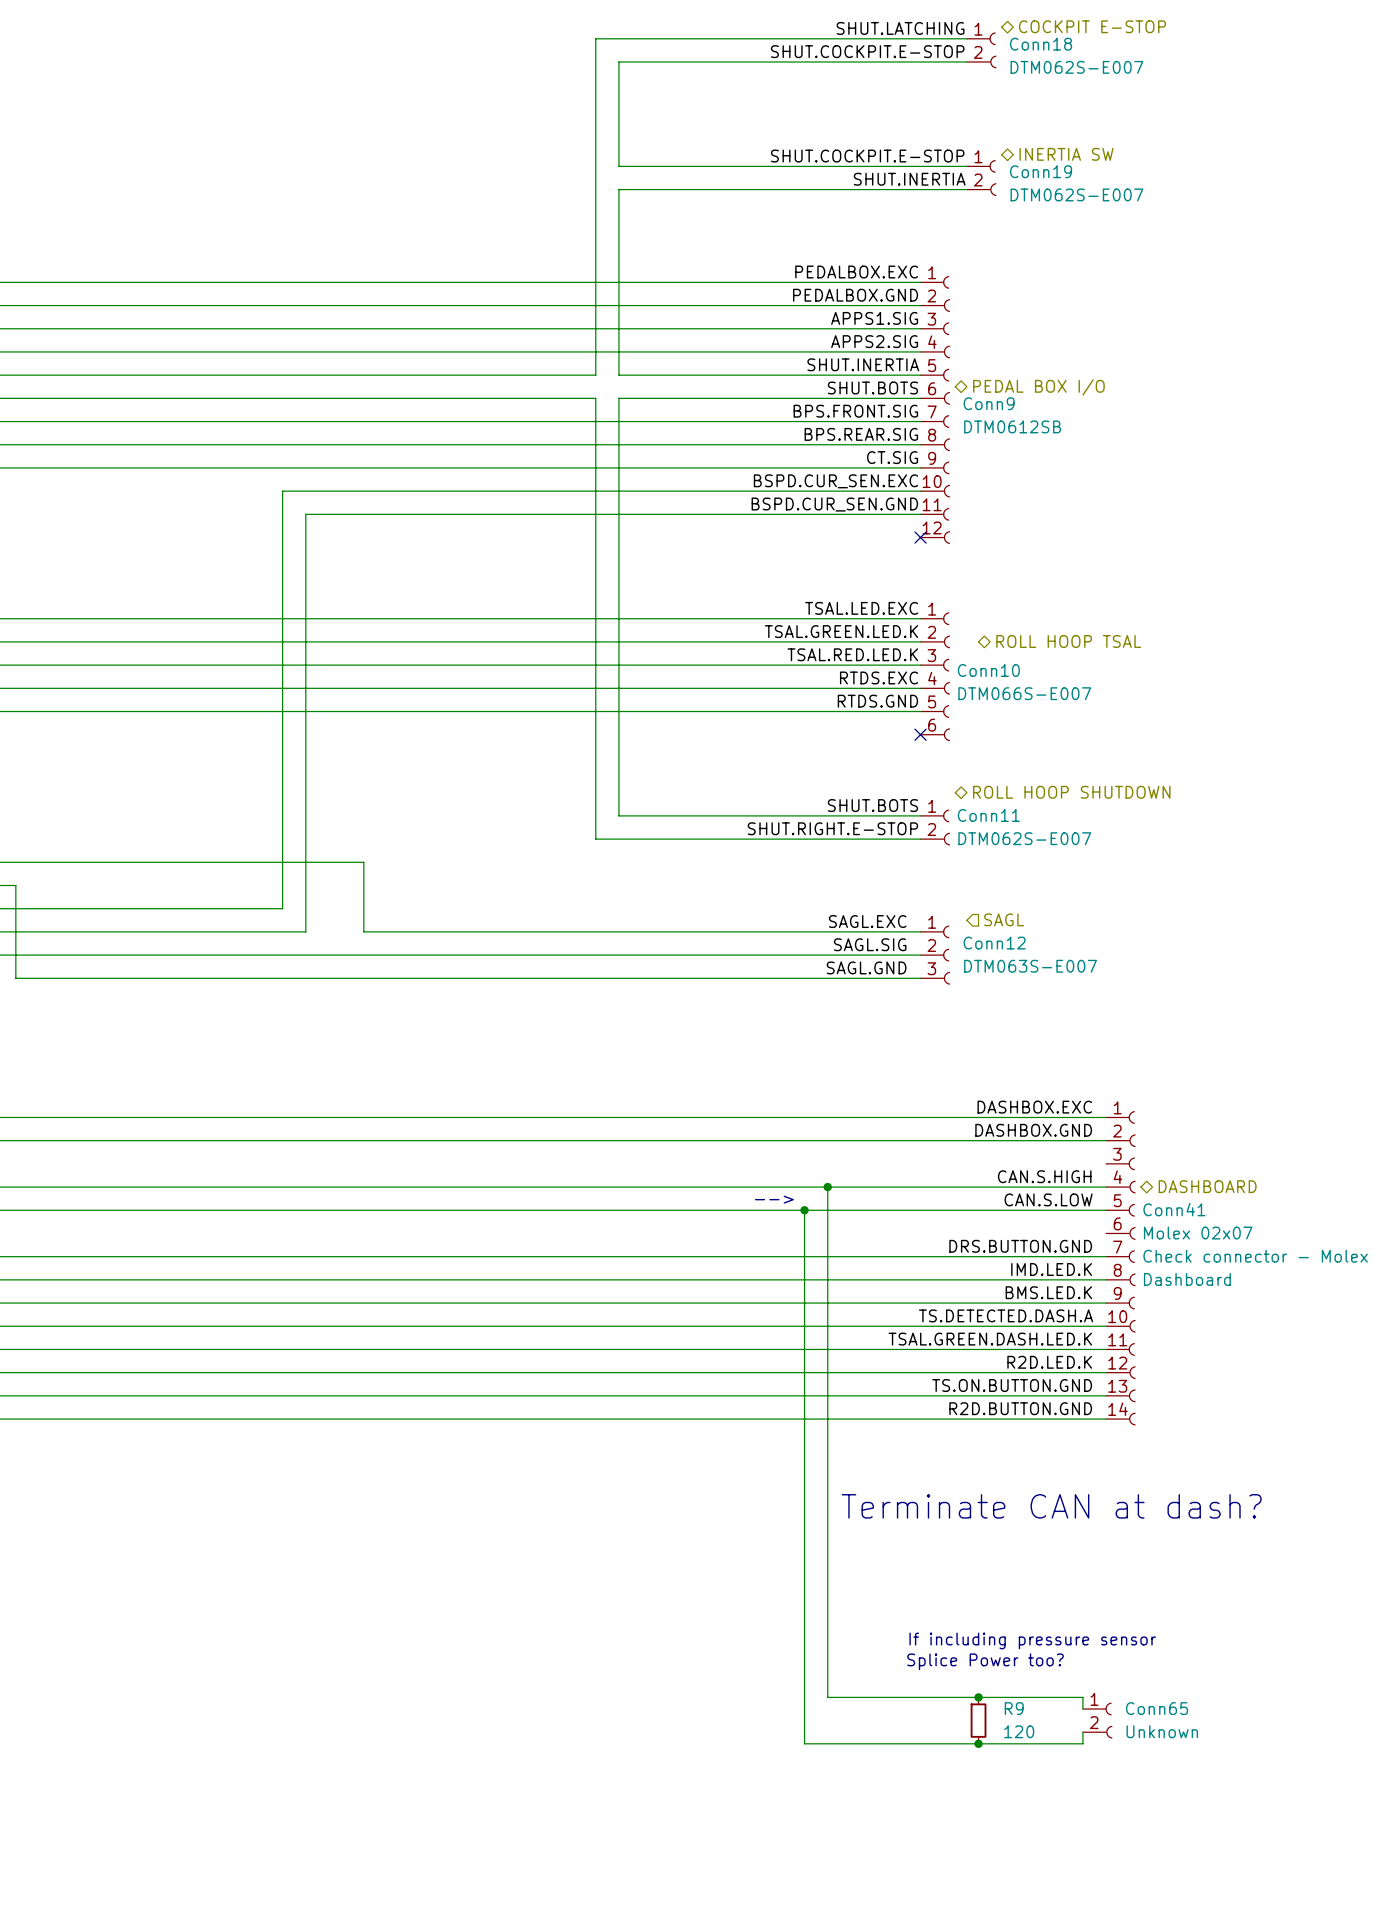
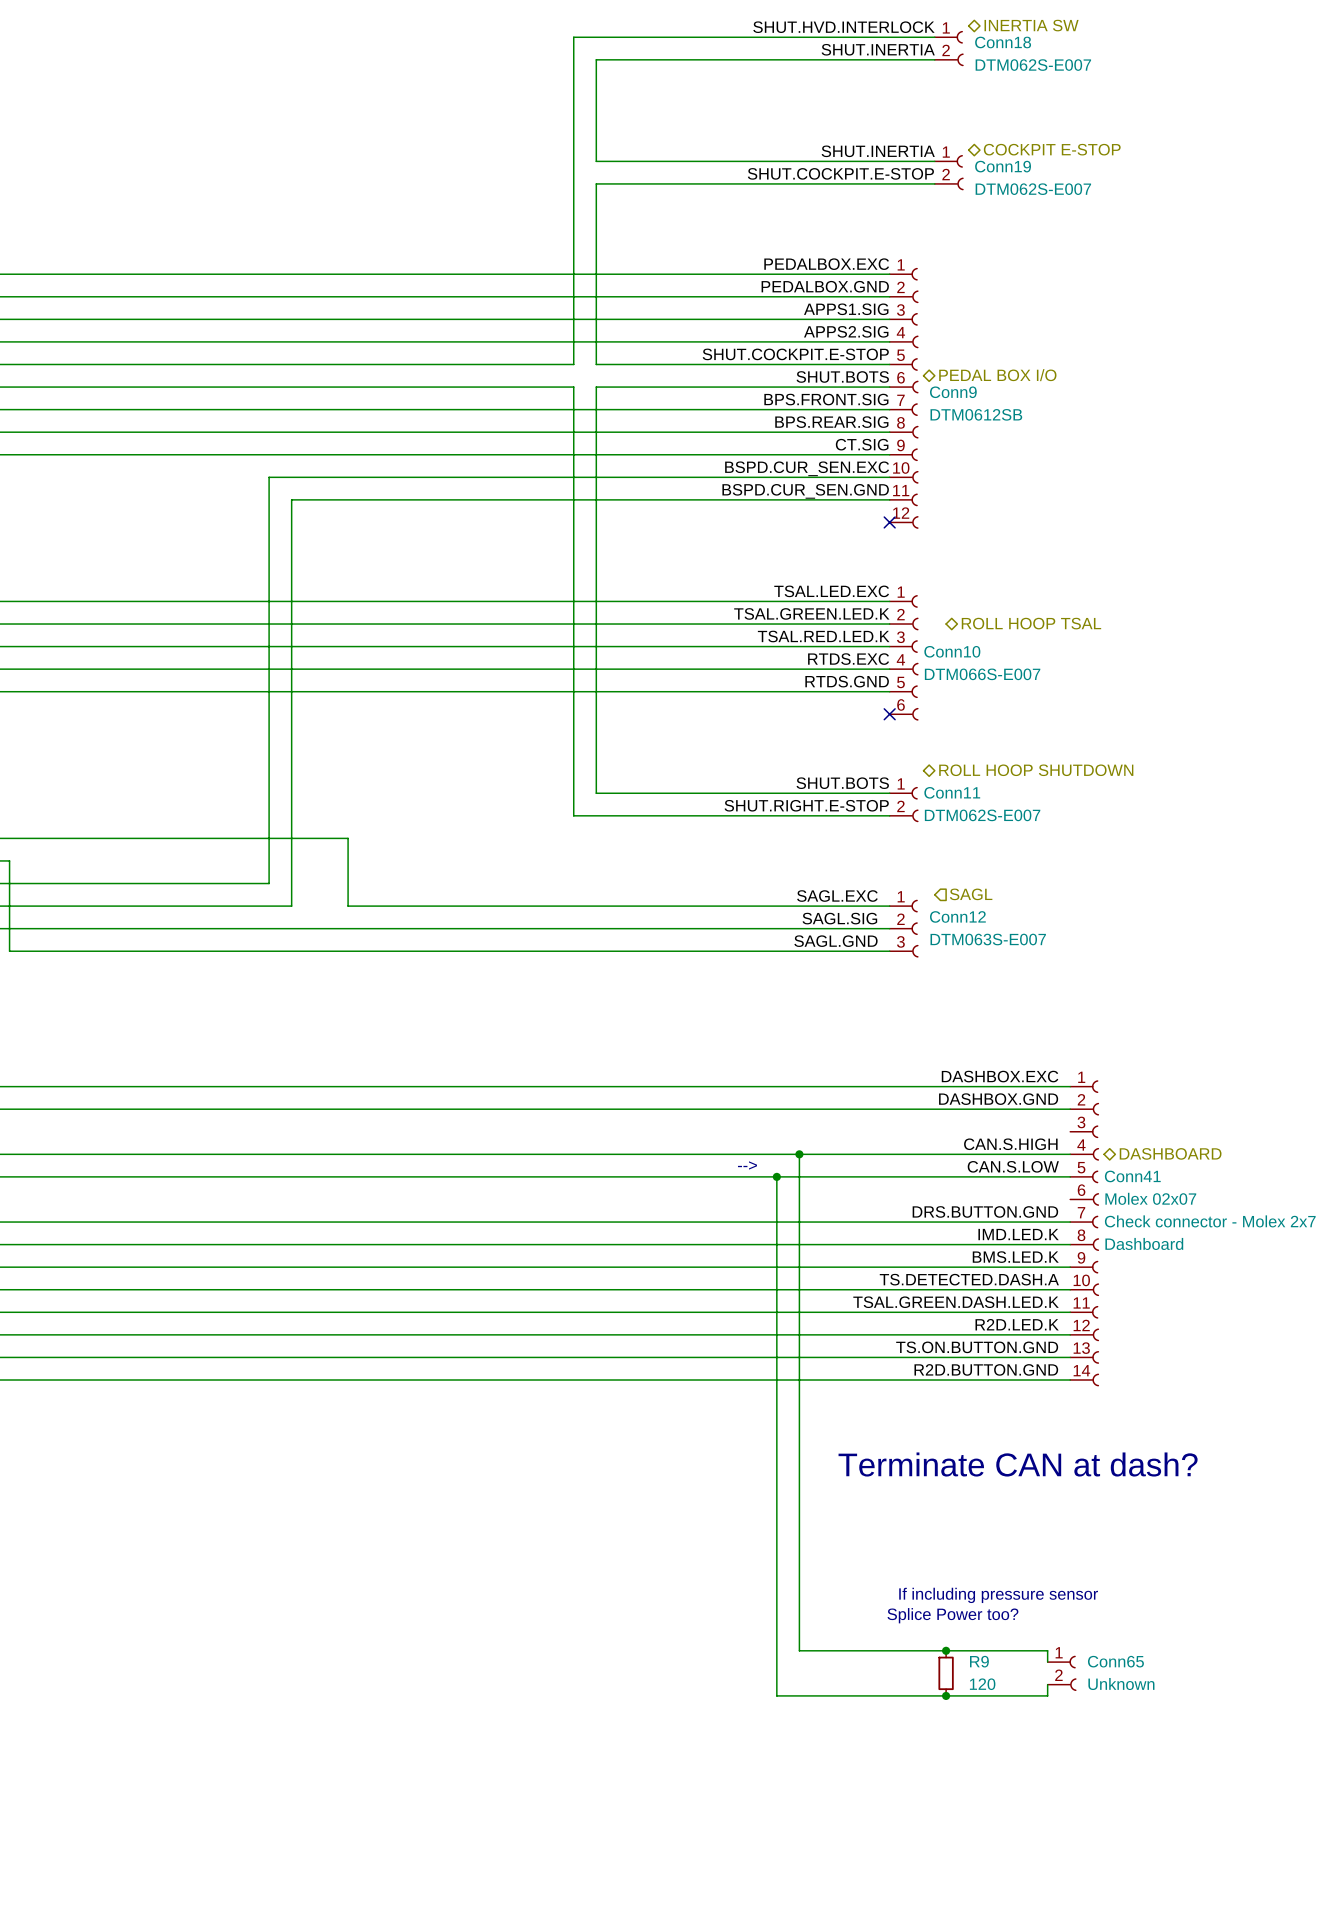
hierarchical label: COCKPIT E-STOP (1092, 26) -> INERTIA SW (1031, 25)
label: SHUT.LATCHING (900, 28) -> SHUT.HVD.INTERLOCK (843, 27)
label: SHUT.COCKPIT.E-STOP (867, 51) -> SHUT.INERTIA (878, 49)
hierarchical label: INERTIA SW (1066, 154) -> COCKPIT E-STOP (1052, 149)
label: SHUT.COCKPIT.E-STOP (867, 156) -> SHUT.INERTIA (878, 151)
label: SHUT.INERTIA (909, 179) -> SHUT.COCKPIT.E-STOP (840, 173)
label: SHUT.INERTIA (863, 364) -> SHUT.COCKPIT.E-STOP (795, 354)

